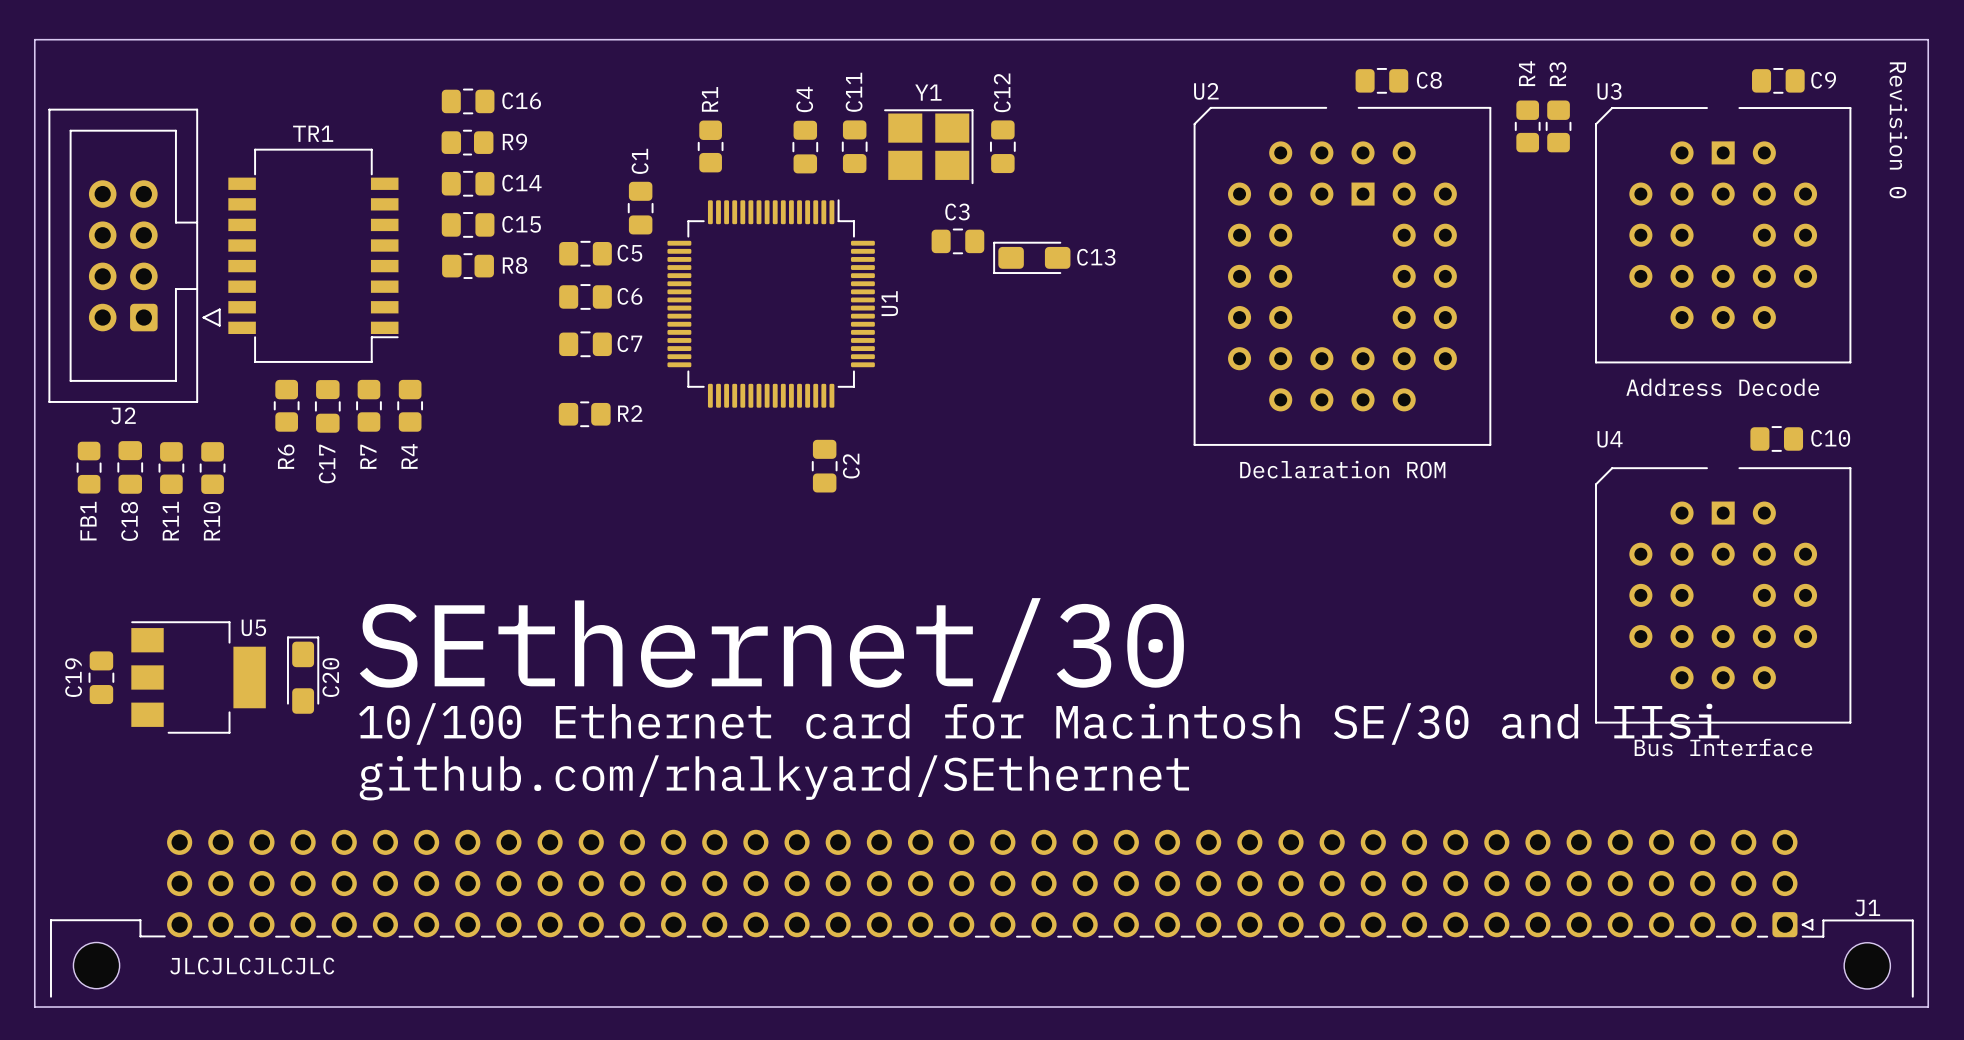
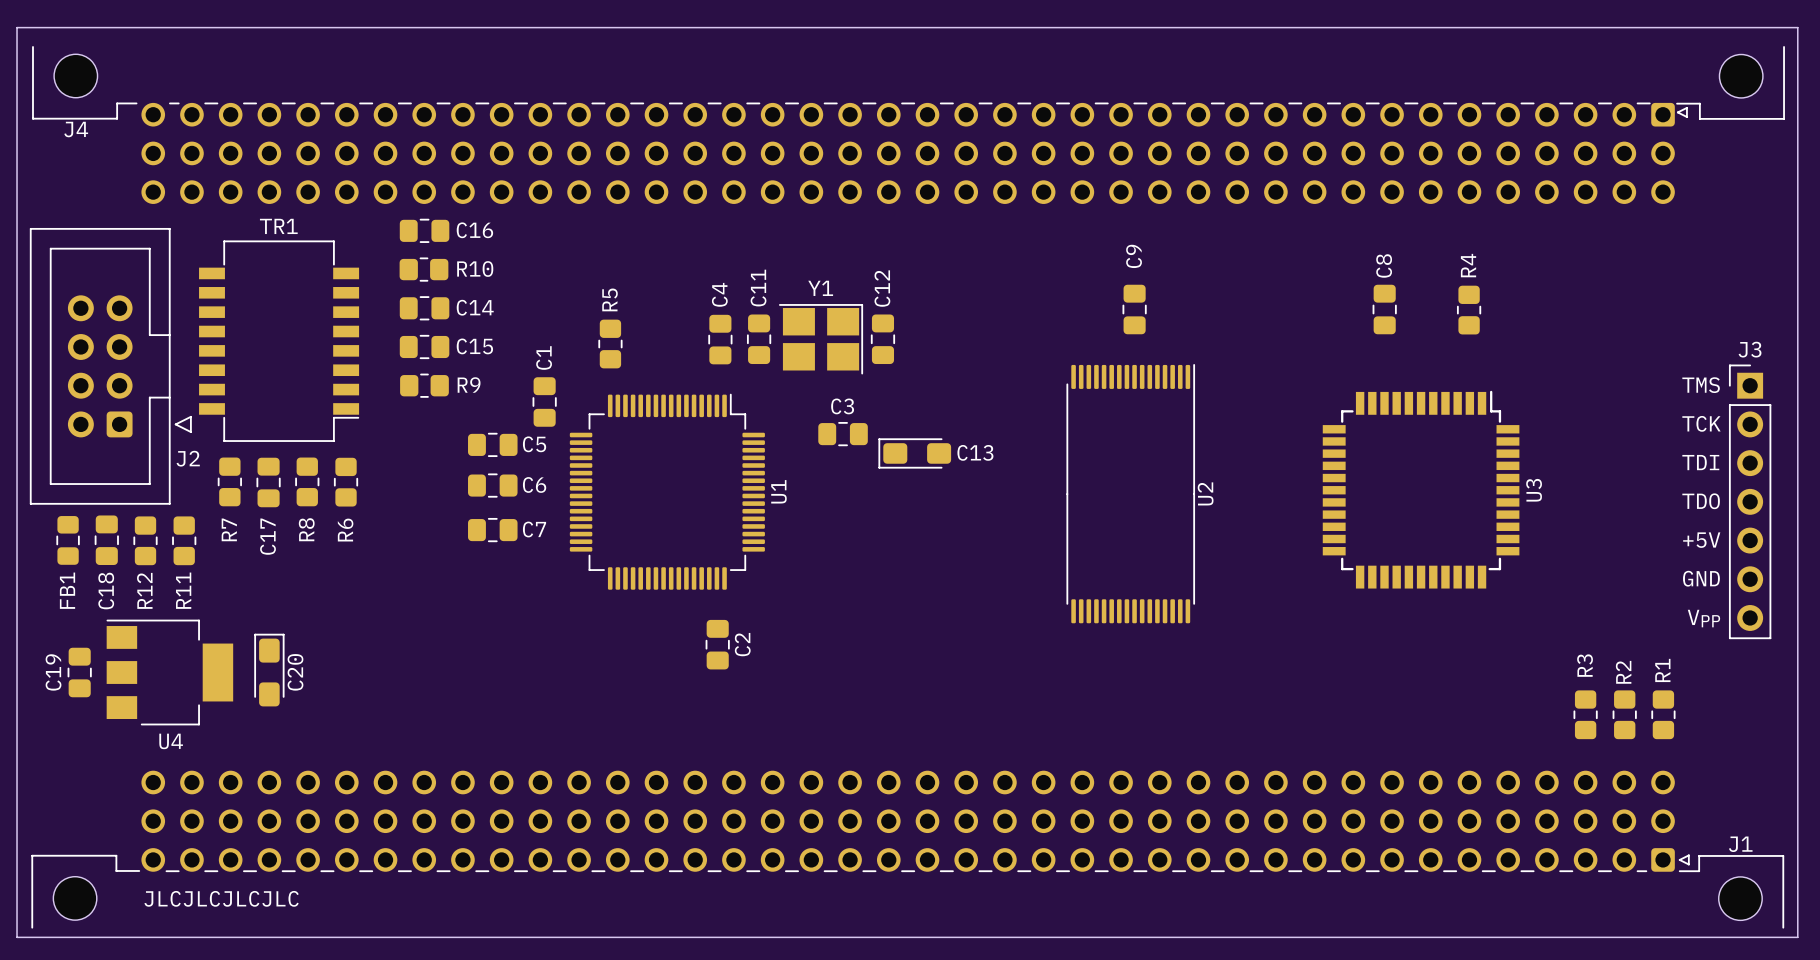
R4 name position: R4 (1527, 73) -> R4 (1468, 265)
C8 rotation: 0° (1381, 80) -> 90° clockwise (1384, 309)
C8 position: (1381, 80) -> (1384, 309)
C8 name position: C8 (1429, 80) -> C8 (1384, 265)
C9 rotation: 0° (1778, 80) -> 90° clockwise (1134, 309)
C9 position: (1778, 80) -> (1134, 309)
C9 name position: C9 (1823, 80) -> C9 (1134, 256)
U2 name position: U2 (1206, 91) -> U2 (1205, 493)
U3 name position: U3 (1609, 91) -> U3 (1534, 490)
C16 position: (468, 101) -> (424, 230)
U2 footprint: [1193, 106, 1492, 446] -> [1066, 364, 1196, 624]
U3 footprint: [1595, 107, 1852, 364] -> [1322, 390, 1520, 589]
R4 position: (1527, 126) -> (1469, 310)
R3 position: (1558, 126) -> (1585, 714)
text: Revision 0 (1898, 130) -> none
R9 position: (467, 142) -> (424, 385)
J4: none -> (908, 125)
R1 position: (710, 146) -> (1663, 714)
C11 position: (854, 146) -> (759, 339)
Y1 position: (928, 146) -> (821, 339)
C12 position: (1002, 146) -> (882, 339)
C4 position: (805, 147) -> (720, 339)
C14 position: (468, 183) -> (424, 308)
C1 position: (640, 208) -> (544, 401)
C15 position: (468, 224) -> (424, 346)
C3 position: (957, 241) -> (843, 434)
C5 position: (585, 253) -> (492, 444)
J2 position: (134, 255) -> (110, 366)
TR1 position: (313, 255) -> (279, 341)
C13 position: (1031, 257) -> (914, 453)
R8 rotation: 0° (468, 266) -> 90° clockwise (307, 481)
R8 position: (468, 266) -> (307, 481)
C6 position: (585, 296) -> (492, 485)
U1 position: (771, 303) -> (667, 491)
C7 position: (585, 344) -> (492, 530)
R5: none -> (610, 344)
text: Address Decode (1722, 387) -> none
R6 position: (286, 405) -> (346, 482)
R7 position: (368, 405) -> (229, 481)
R4: (410, 405) -> none
C17 position: (327, 406) -> (268, 482)
R2 name position: R2 (630, 413) -> R2 (1623, 672)
R2 rotation: 0° (584, 414) -> 90° clockwise (1624, 714)
R2 position: (584, 414) -> (1624, 714)
J2 name position: J2 (123, 415) -> J2 (188, 458)
text: none -> TMS (1701, 385)
C10: (1776, 438) -> none
U4 name position: U4 (1610, 439) -> U4 (171, 741)
text: none -> TCK (1701, 423)
C2 position: (824, 466) -> (717, 644)
FB1 position: (89, 467) -> (68, 540)
C18 position: (130, 467) -> (106, 540)
U4 footprint: [1595, 467, 1852, 724] -> [106, 619, 234, 726]
R11 position: (171, 468) -> (184, 540)
R10 rotation: 0° (212, 468) -> 90° clockwise (423, 269)
R10 position: (212, 468) -> (423, 269)
text: Declaration ROM (1342, 469) -> none
text: none -> TDI (1700, 462)
R10 name position: R10 (211, 521) -> R10 (475, 269)
text: none -> TDO (1701, 501)
J3: none -> (1750, 501)
text: none -> +5V (1701, 540)
R12: none -> (145, 540)
text: none -> GND (1701, 578)
text: SEthernet/30 (771, 650) -> none
text: none -> VPP (1703, 618)
C20 position: (303, 675) -> (269, 670)
C19 position: (101, 677) -> (79, 672)
U5: (198, 677) -> none
text: 10/100 Ethernet card for Macintosh SE/30 and IIsi (1039, 723) -> none
text: Bus Interface (1723, 747) -> none
text: github.com/rhalkyard/SEthernet (774, 777) -> none

